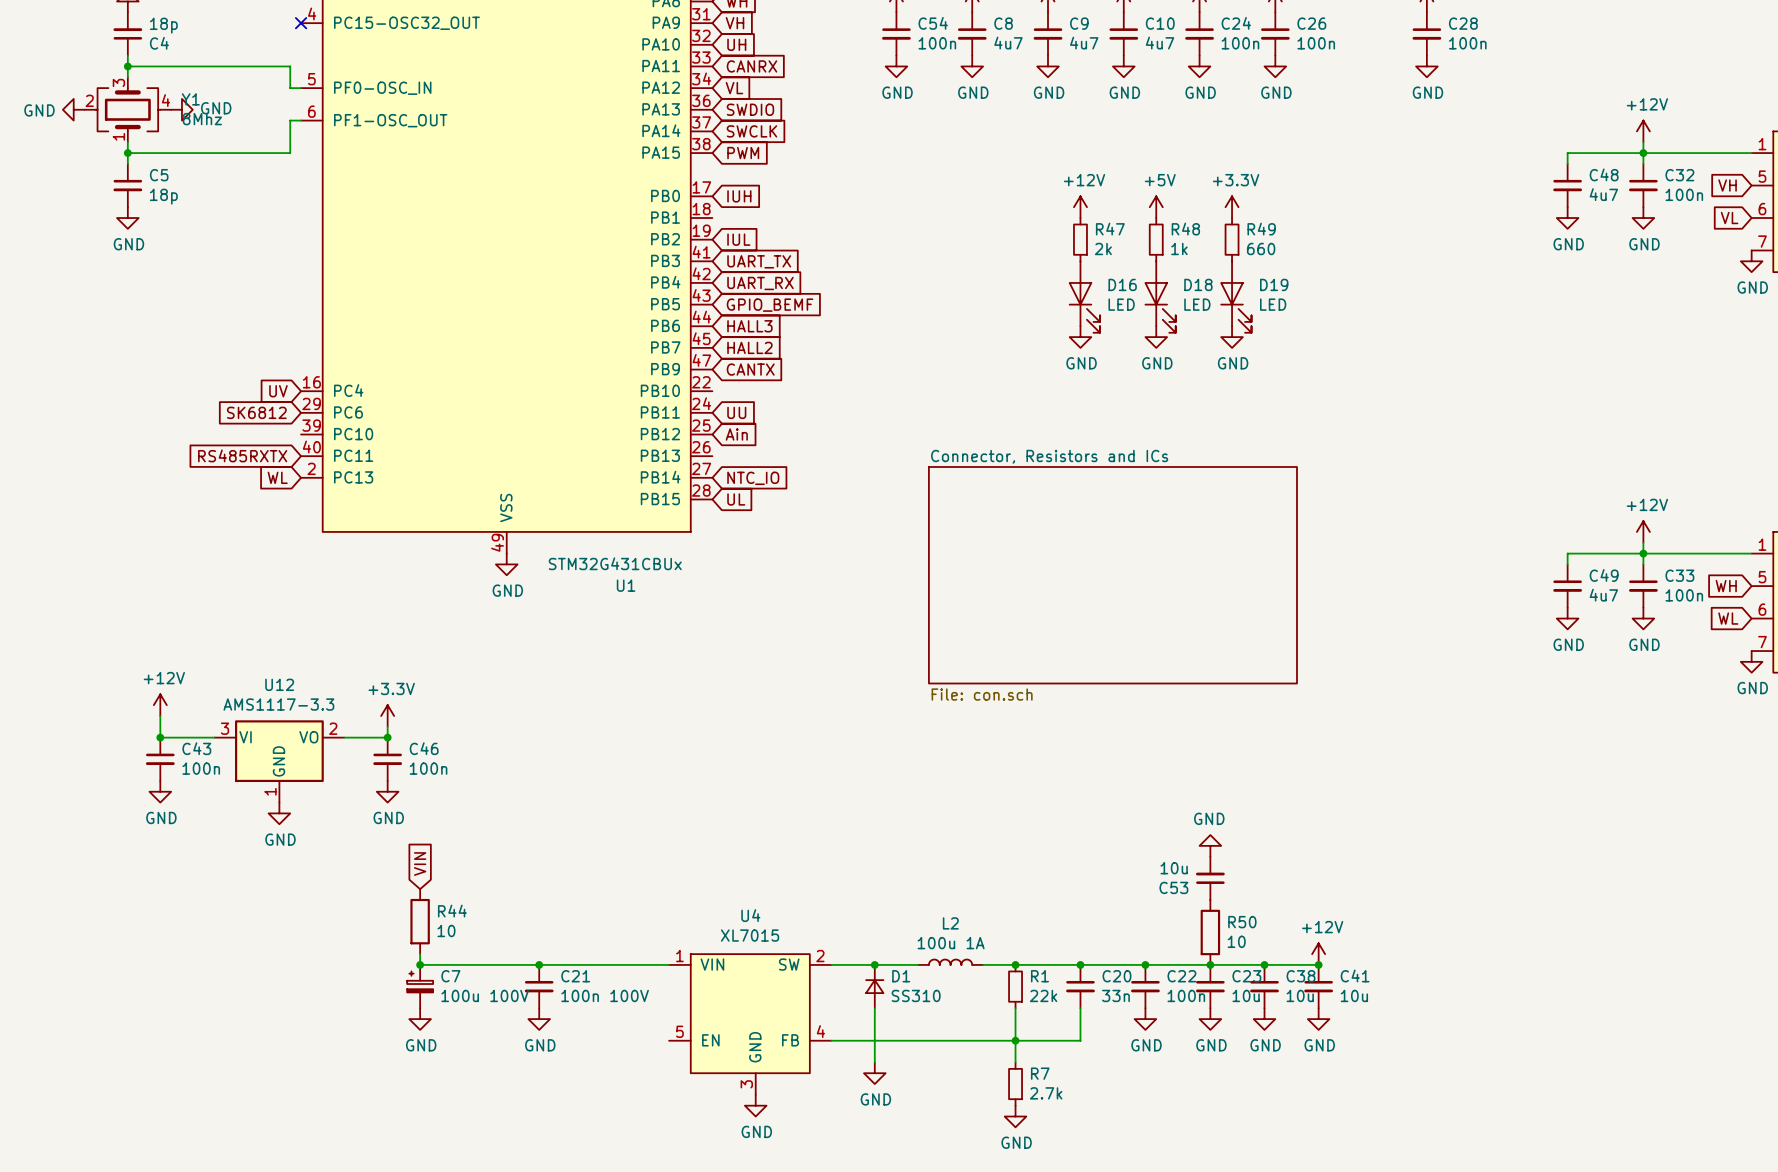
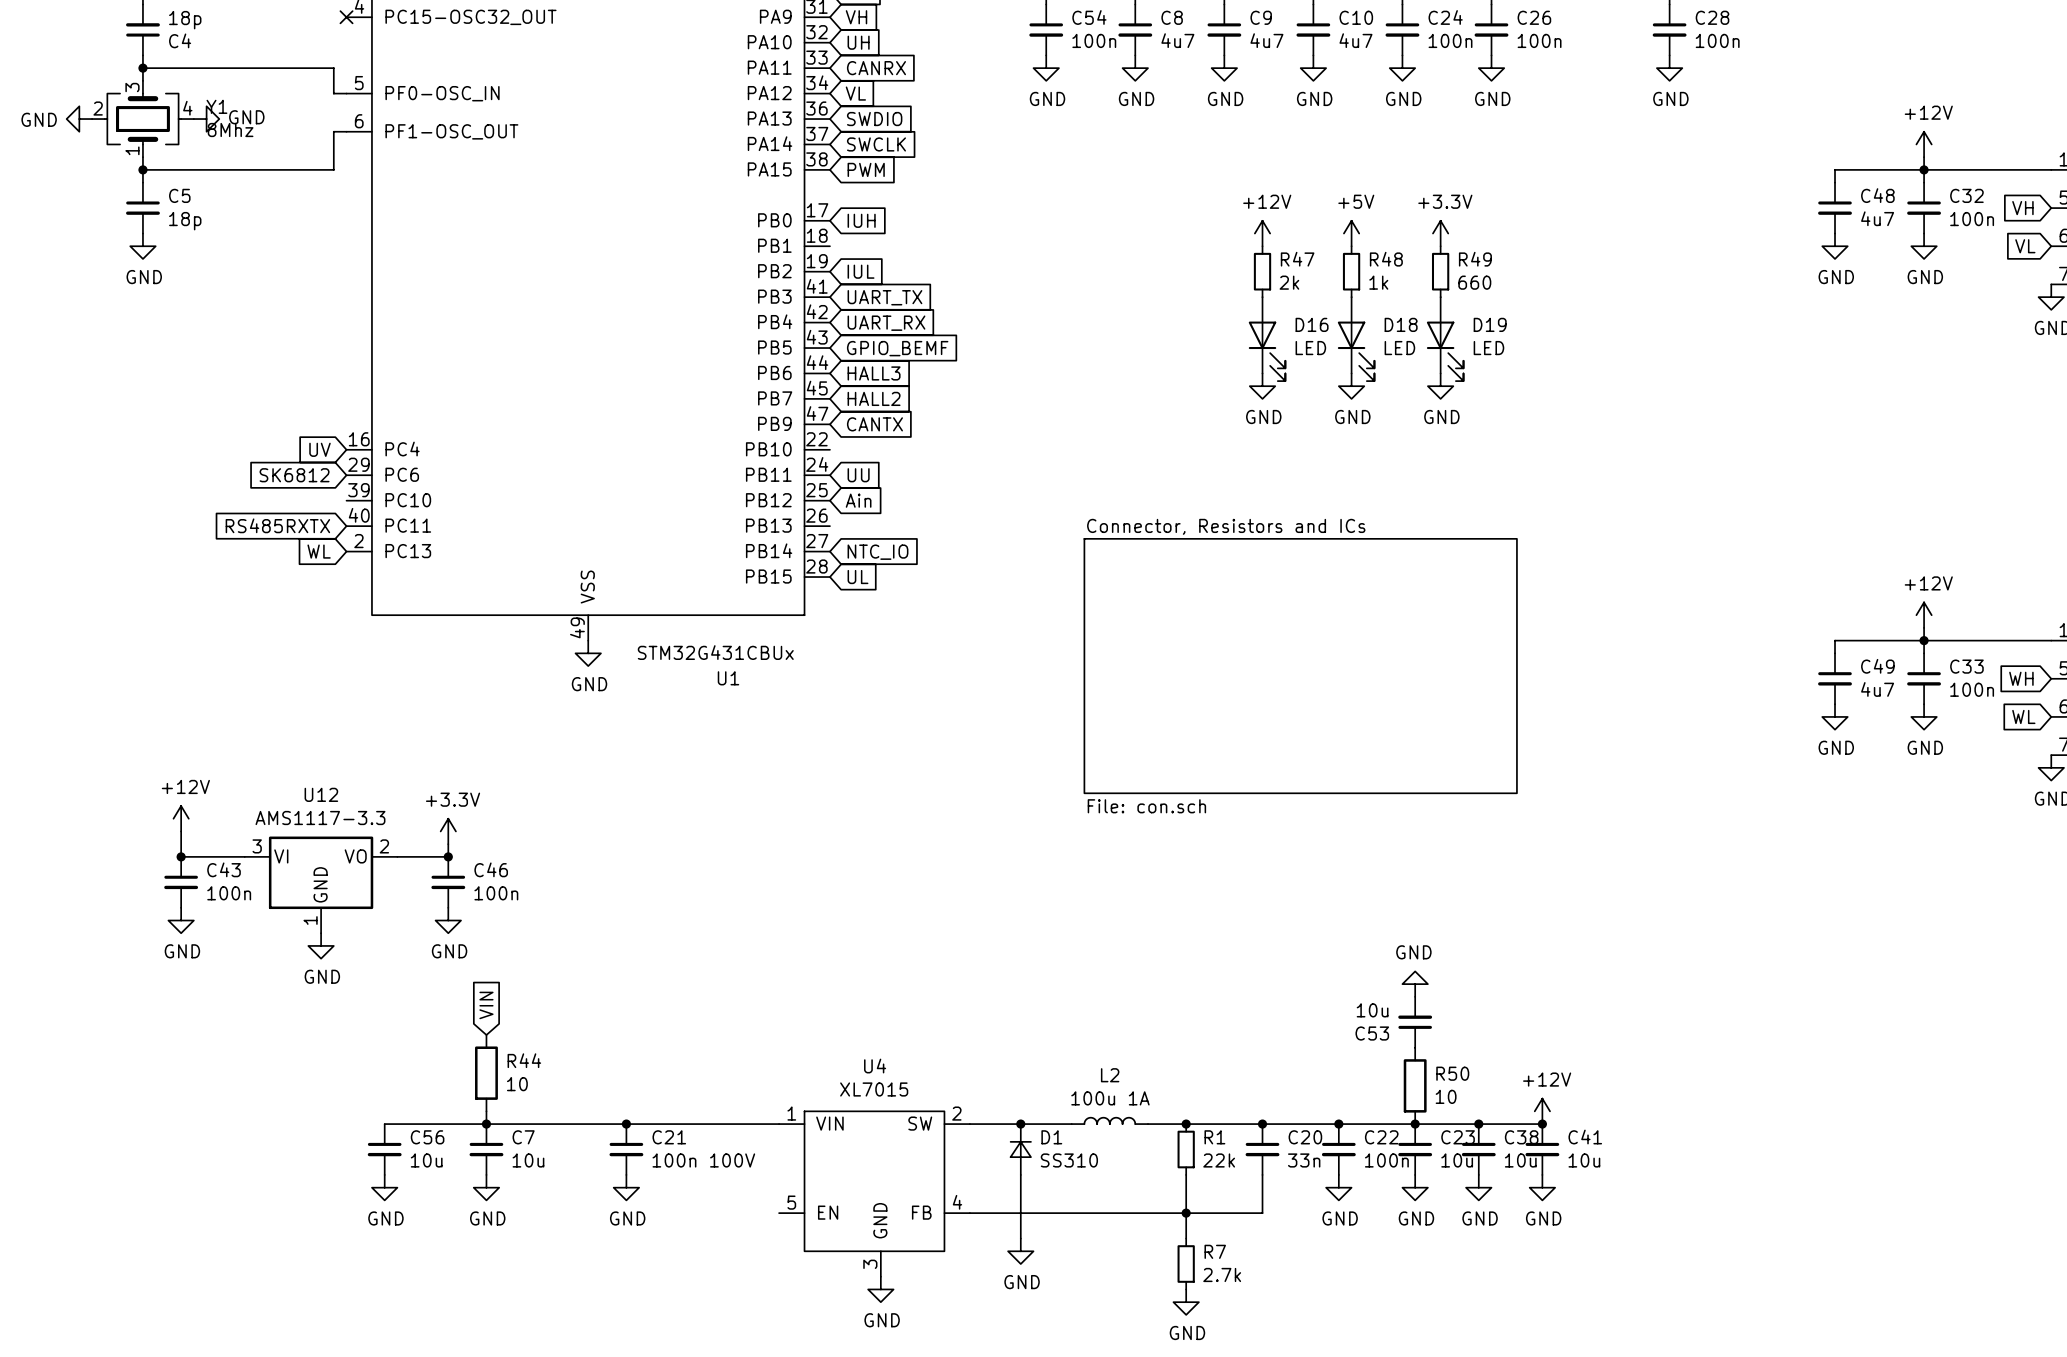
wire: none -> (384, 1124) (486, 1124)
C7 symbol: [407, 964, 434, 1009] -> [469, 1124, 504, 1175]
C56: none -> 10u (384, 1149)
C7 value: 100u 100V (485, 995) -> 10u (528, 1160)
power symbol: none -> GND (384, 1187)

